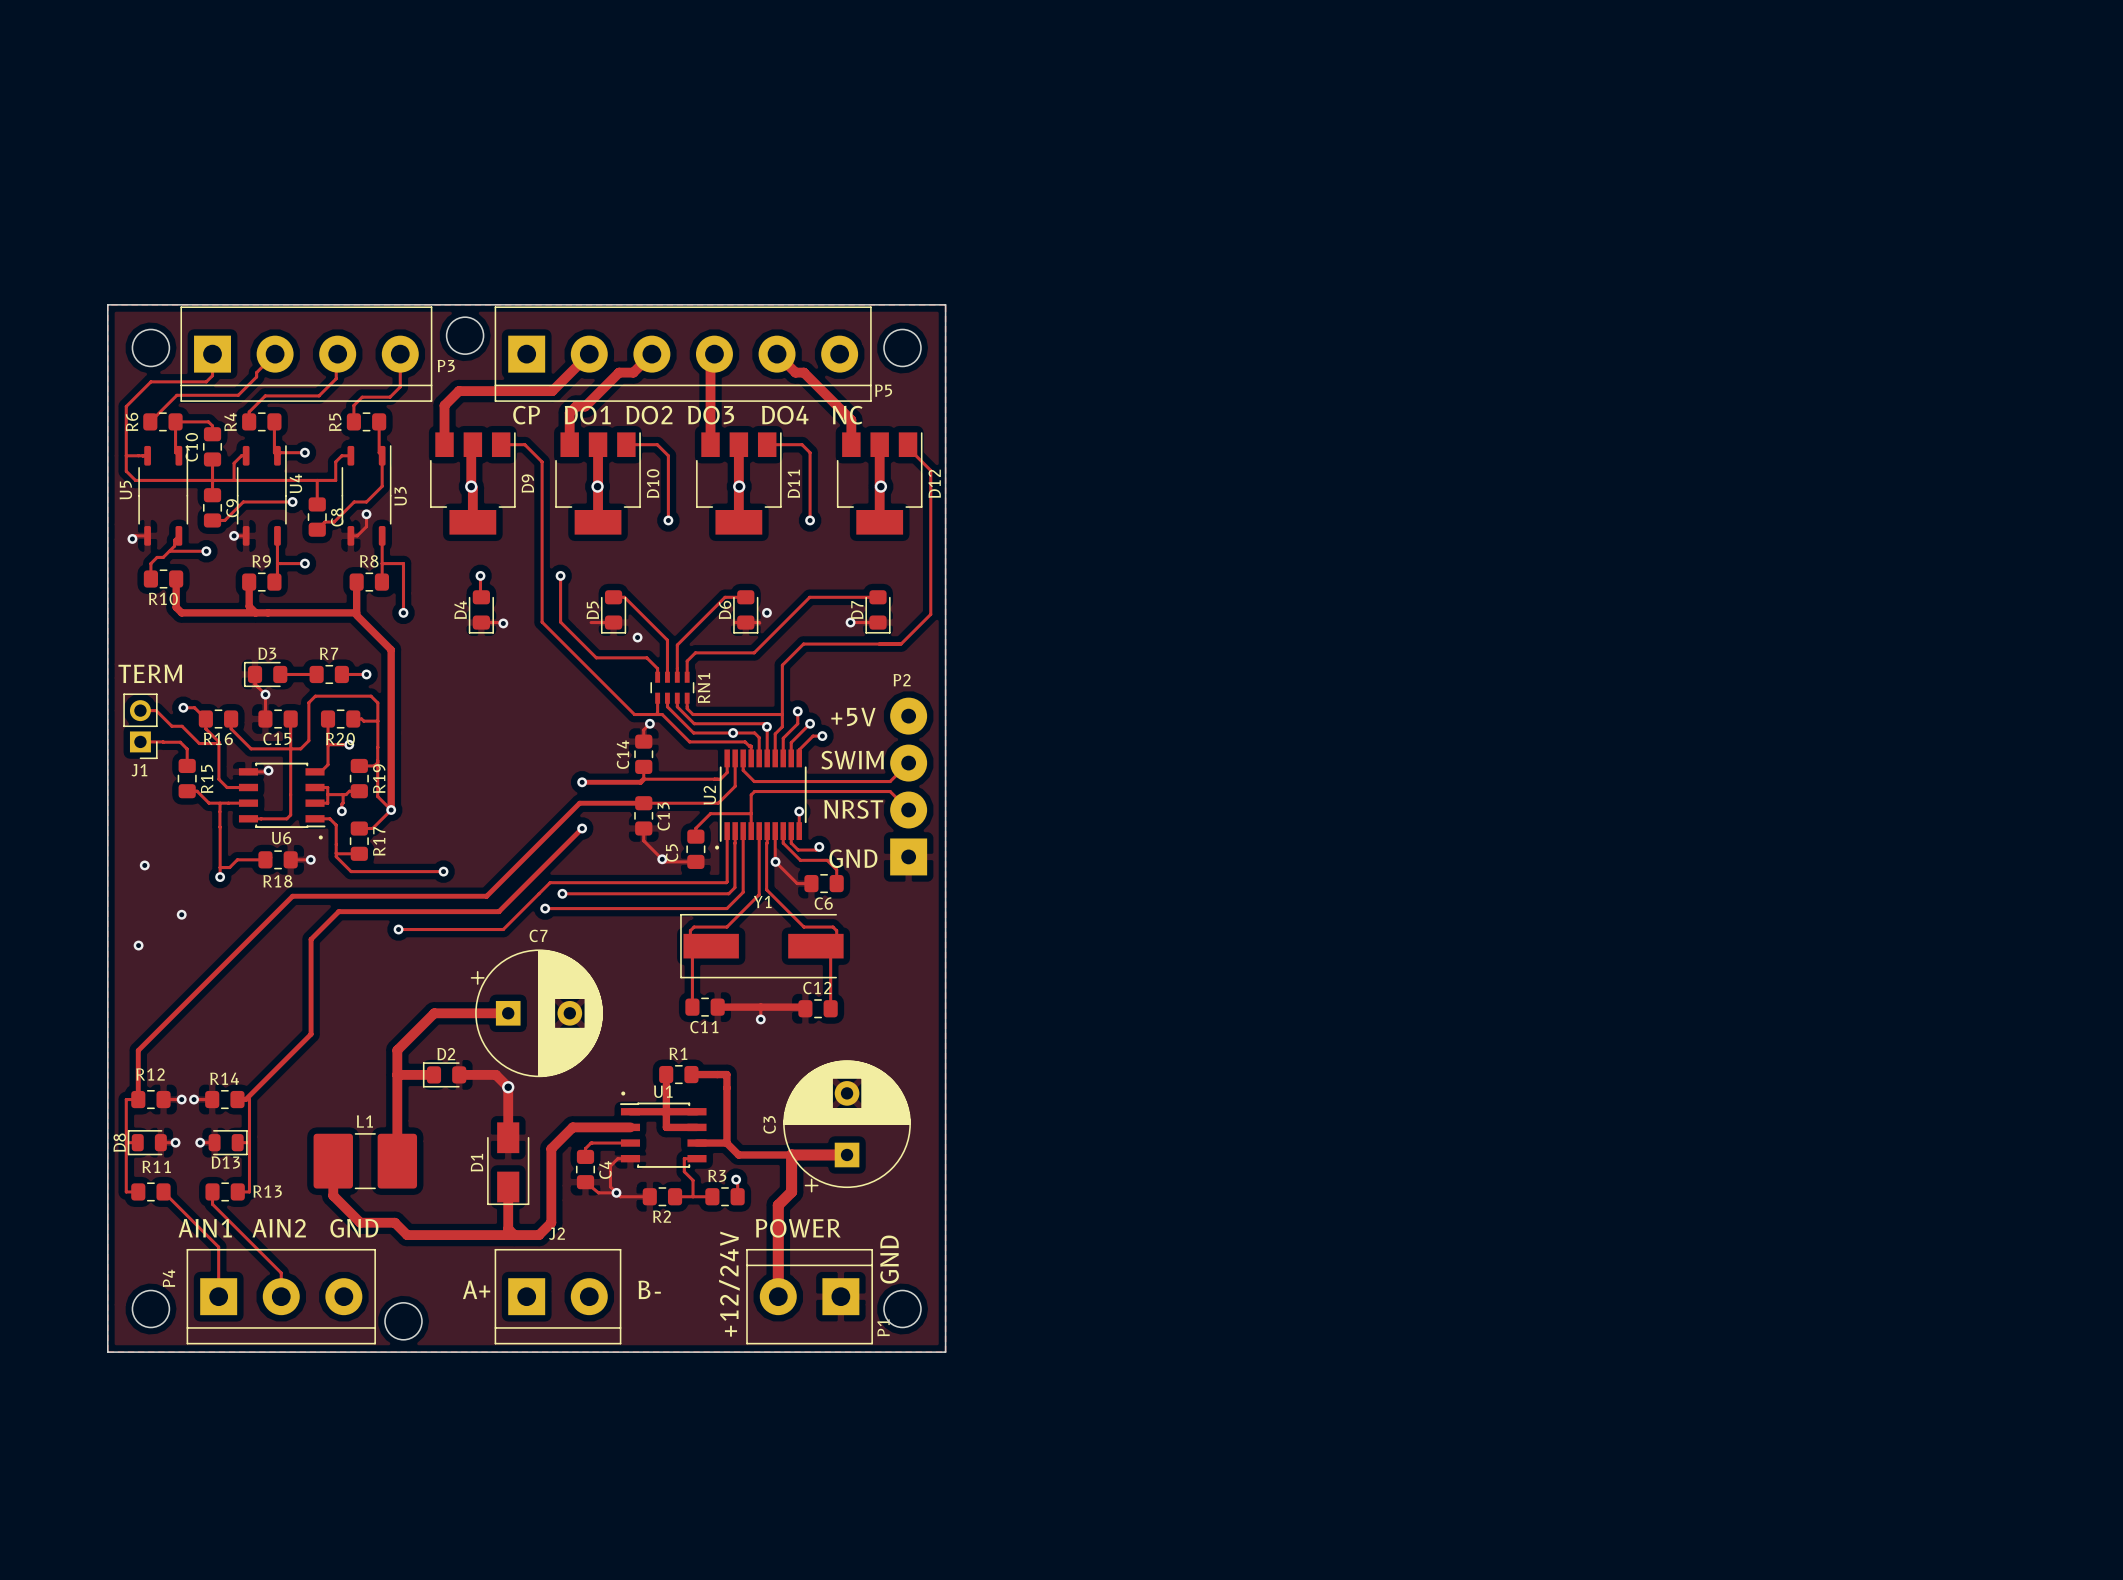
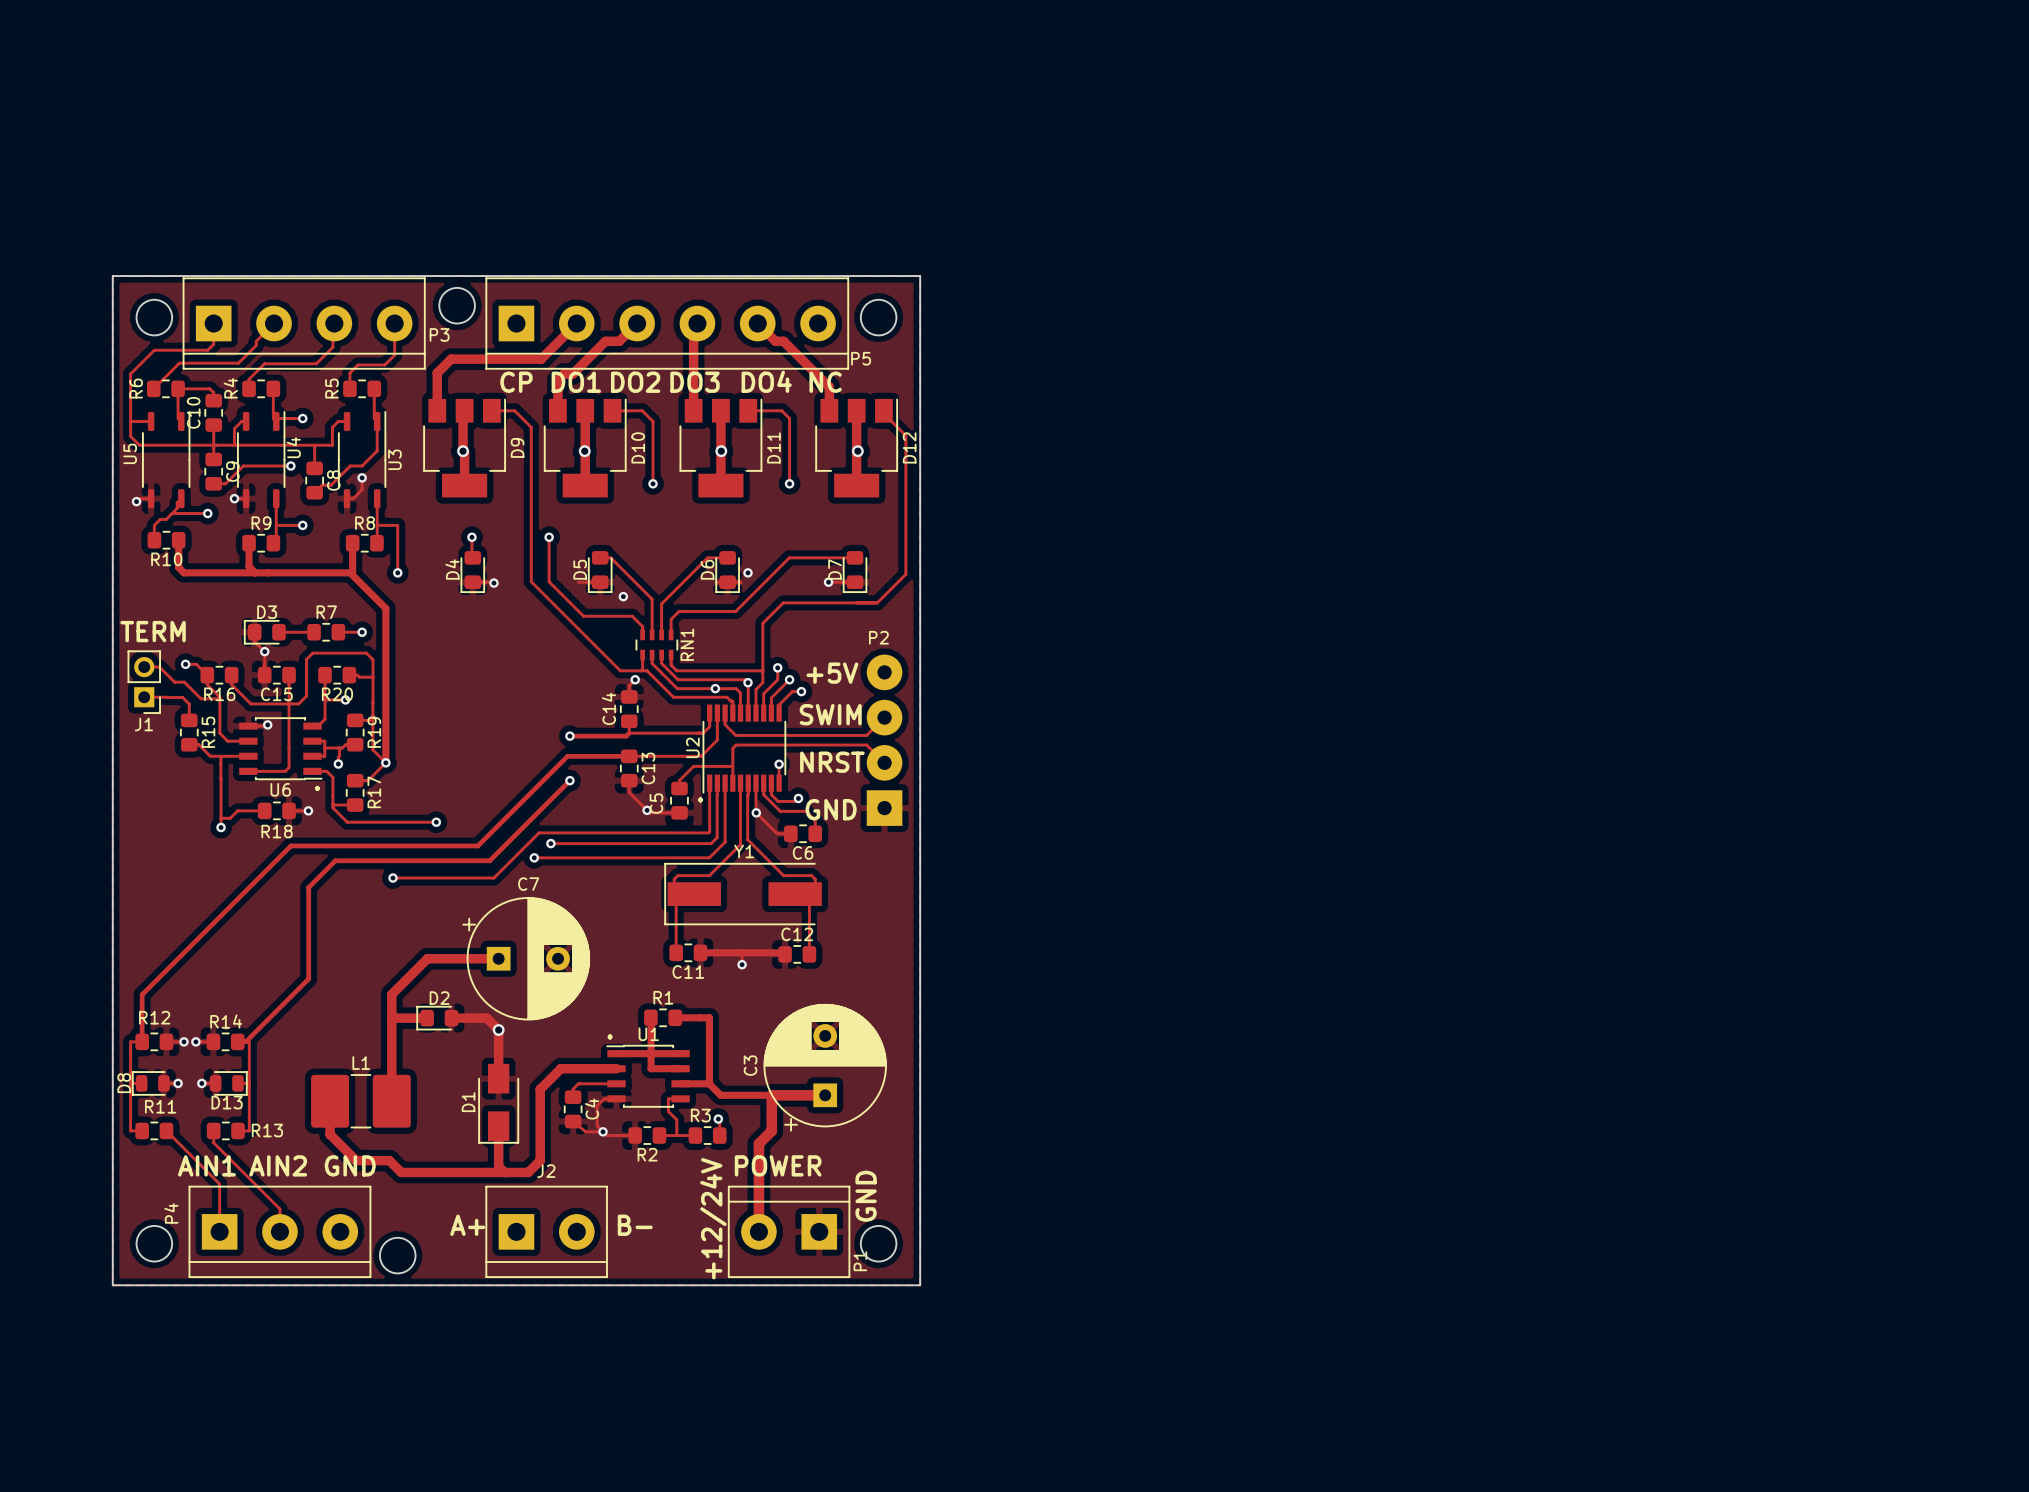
via: (144, 865) -> none
via: (181, 914) -> none
via: (138, 945) -> none

